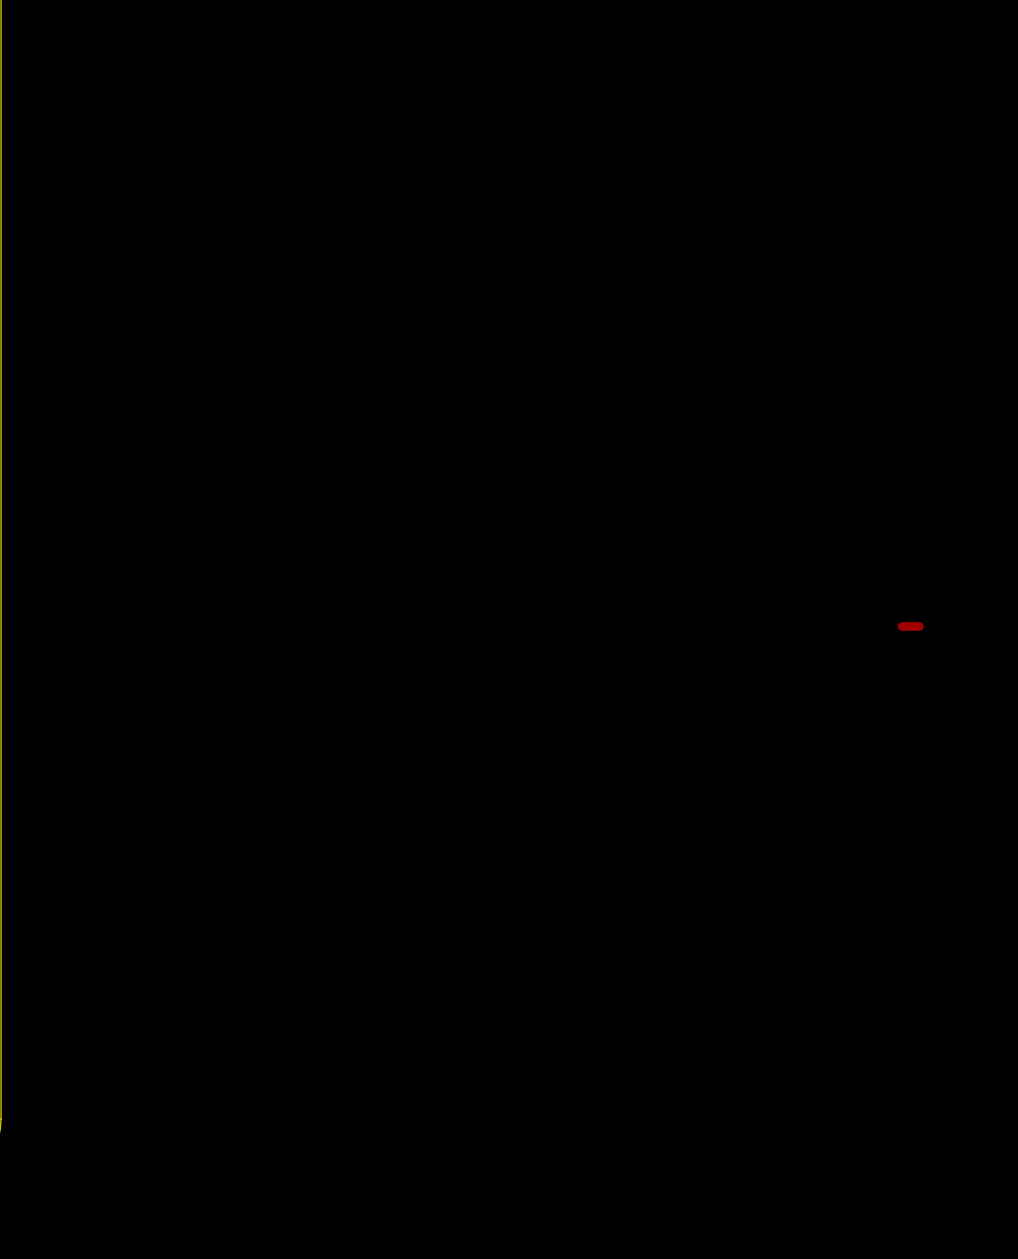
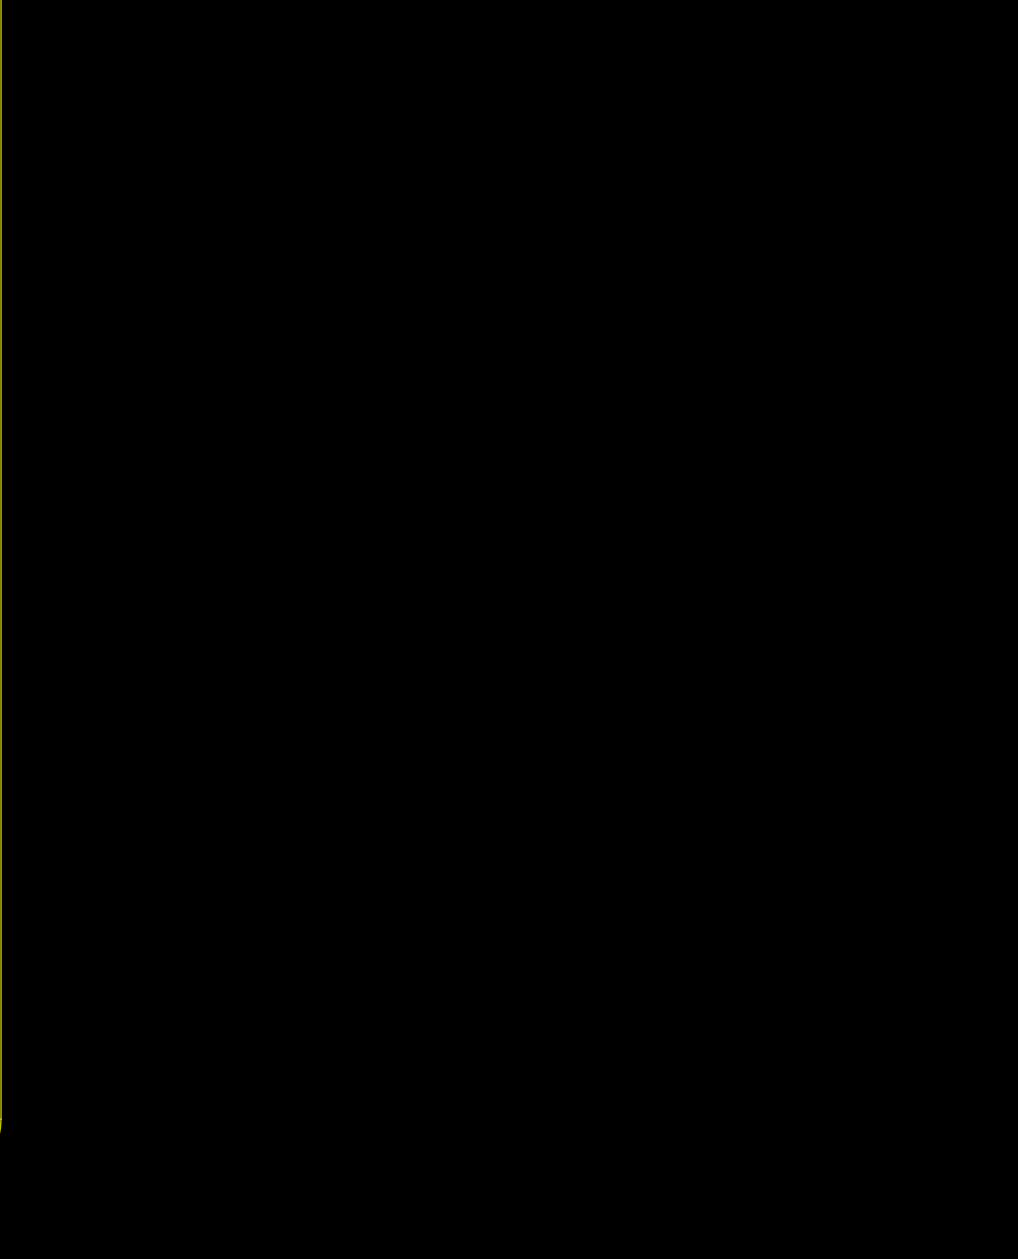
part: (910, 626) -> none

